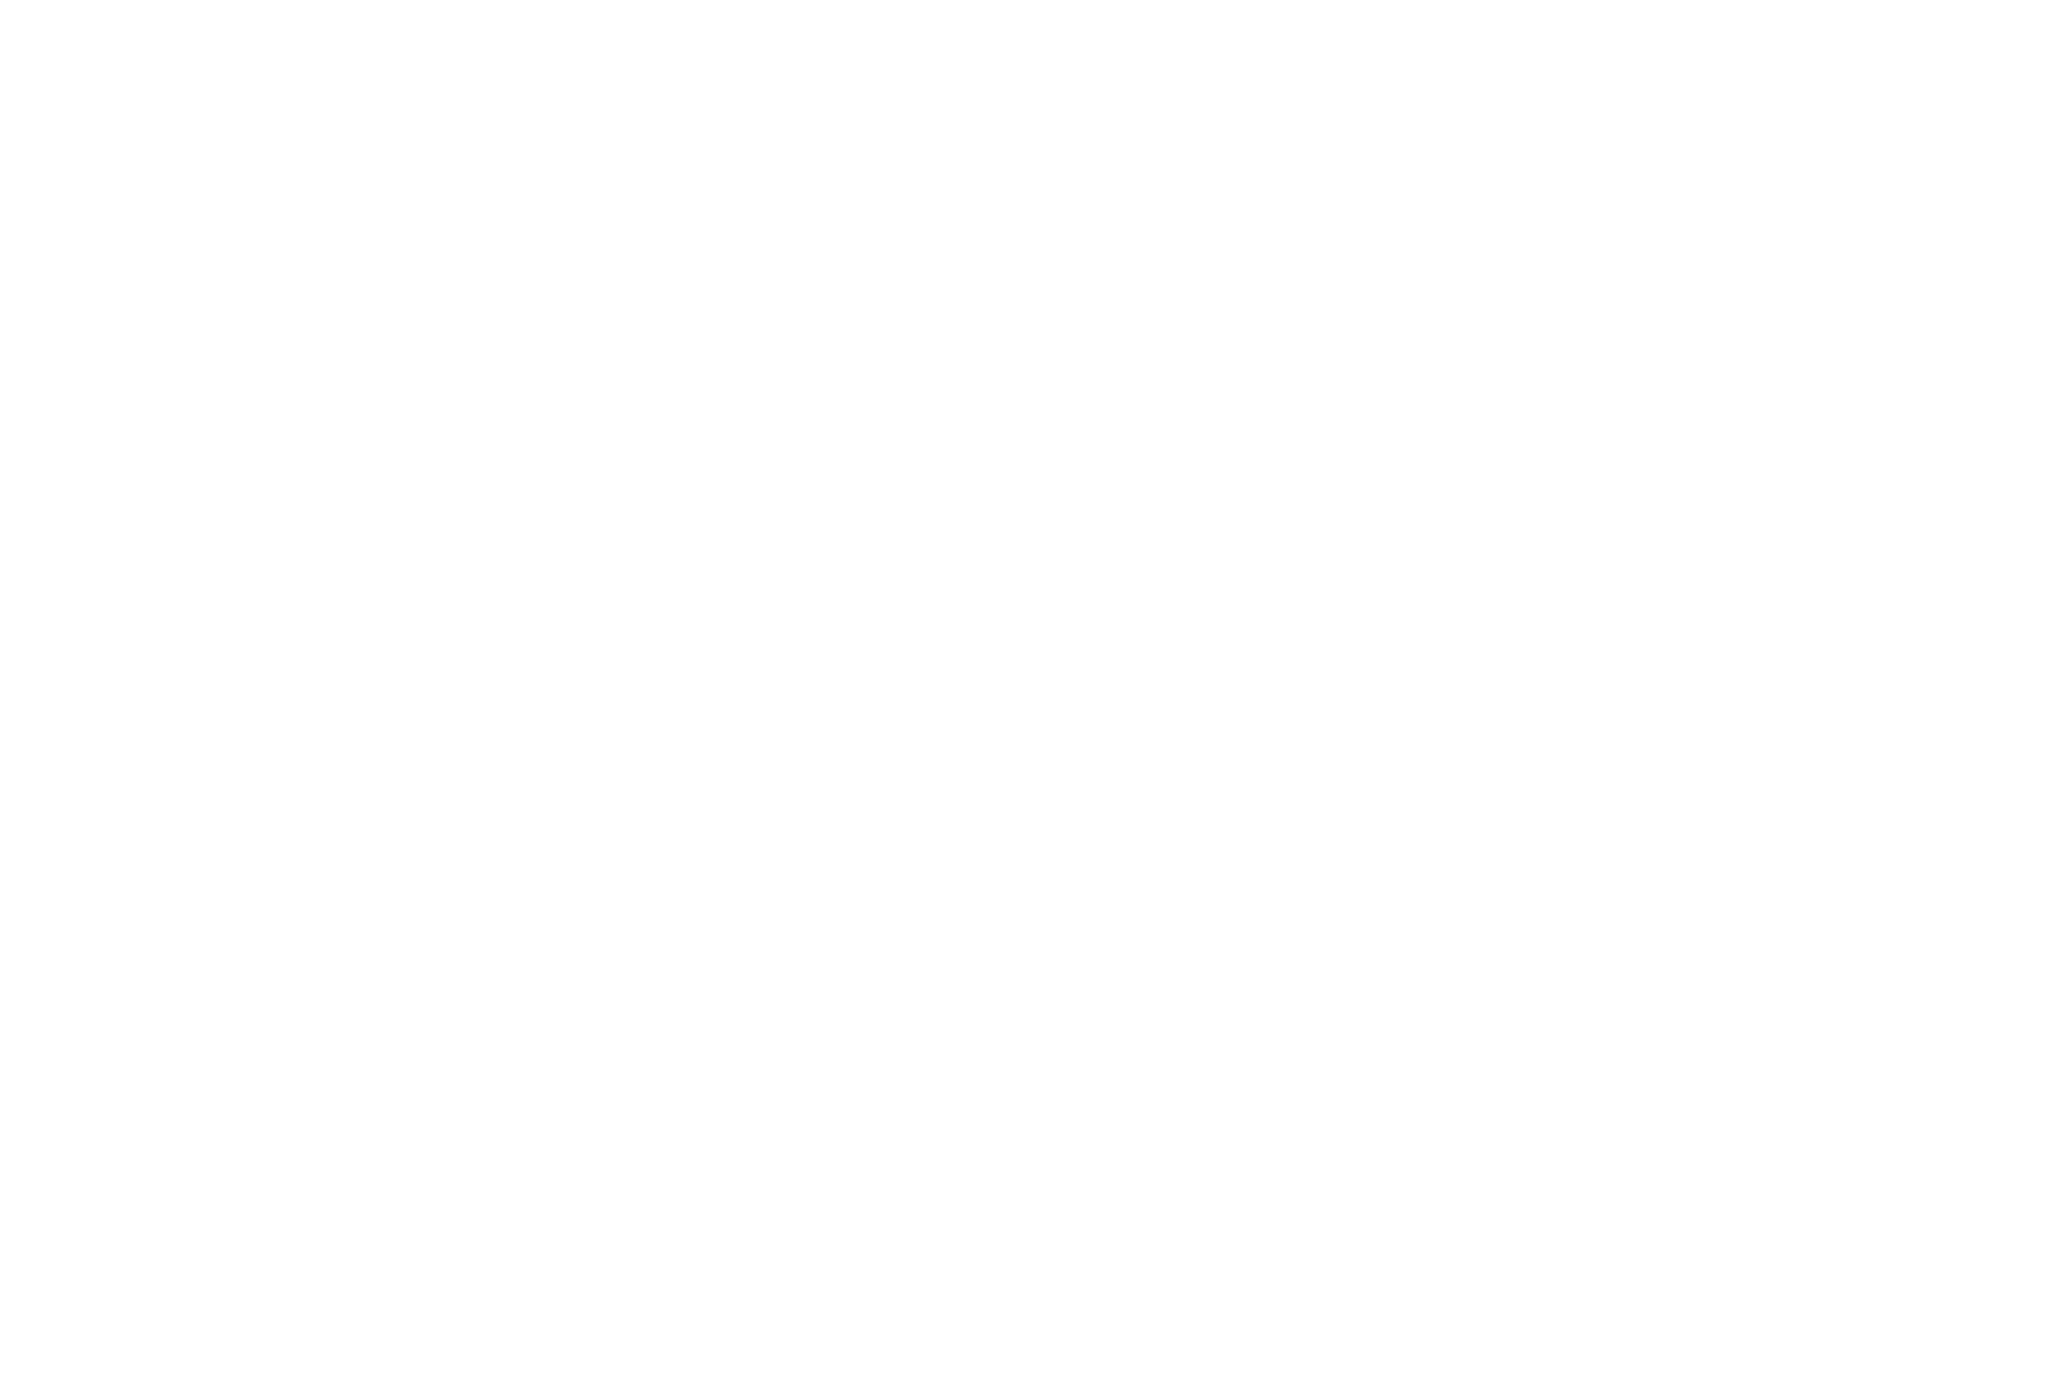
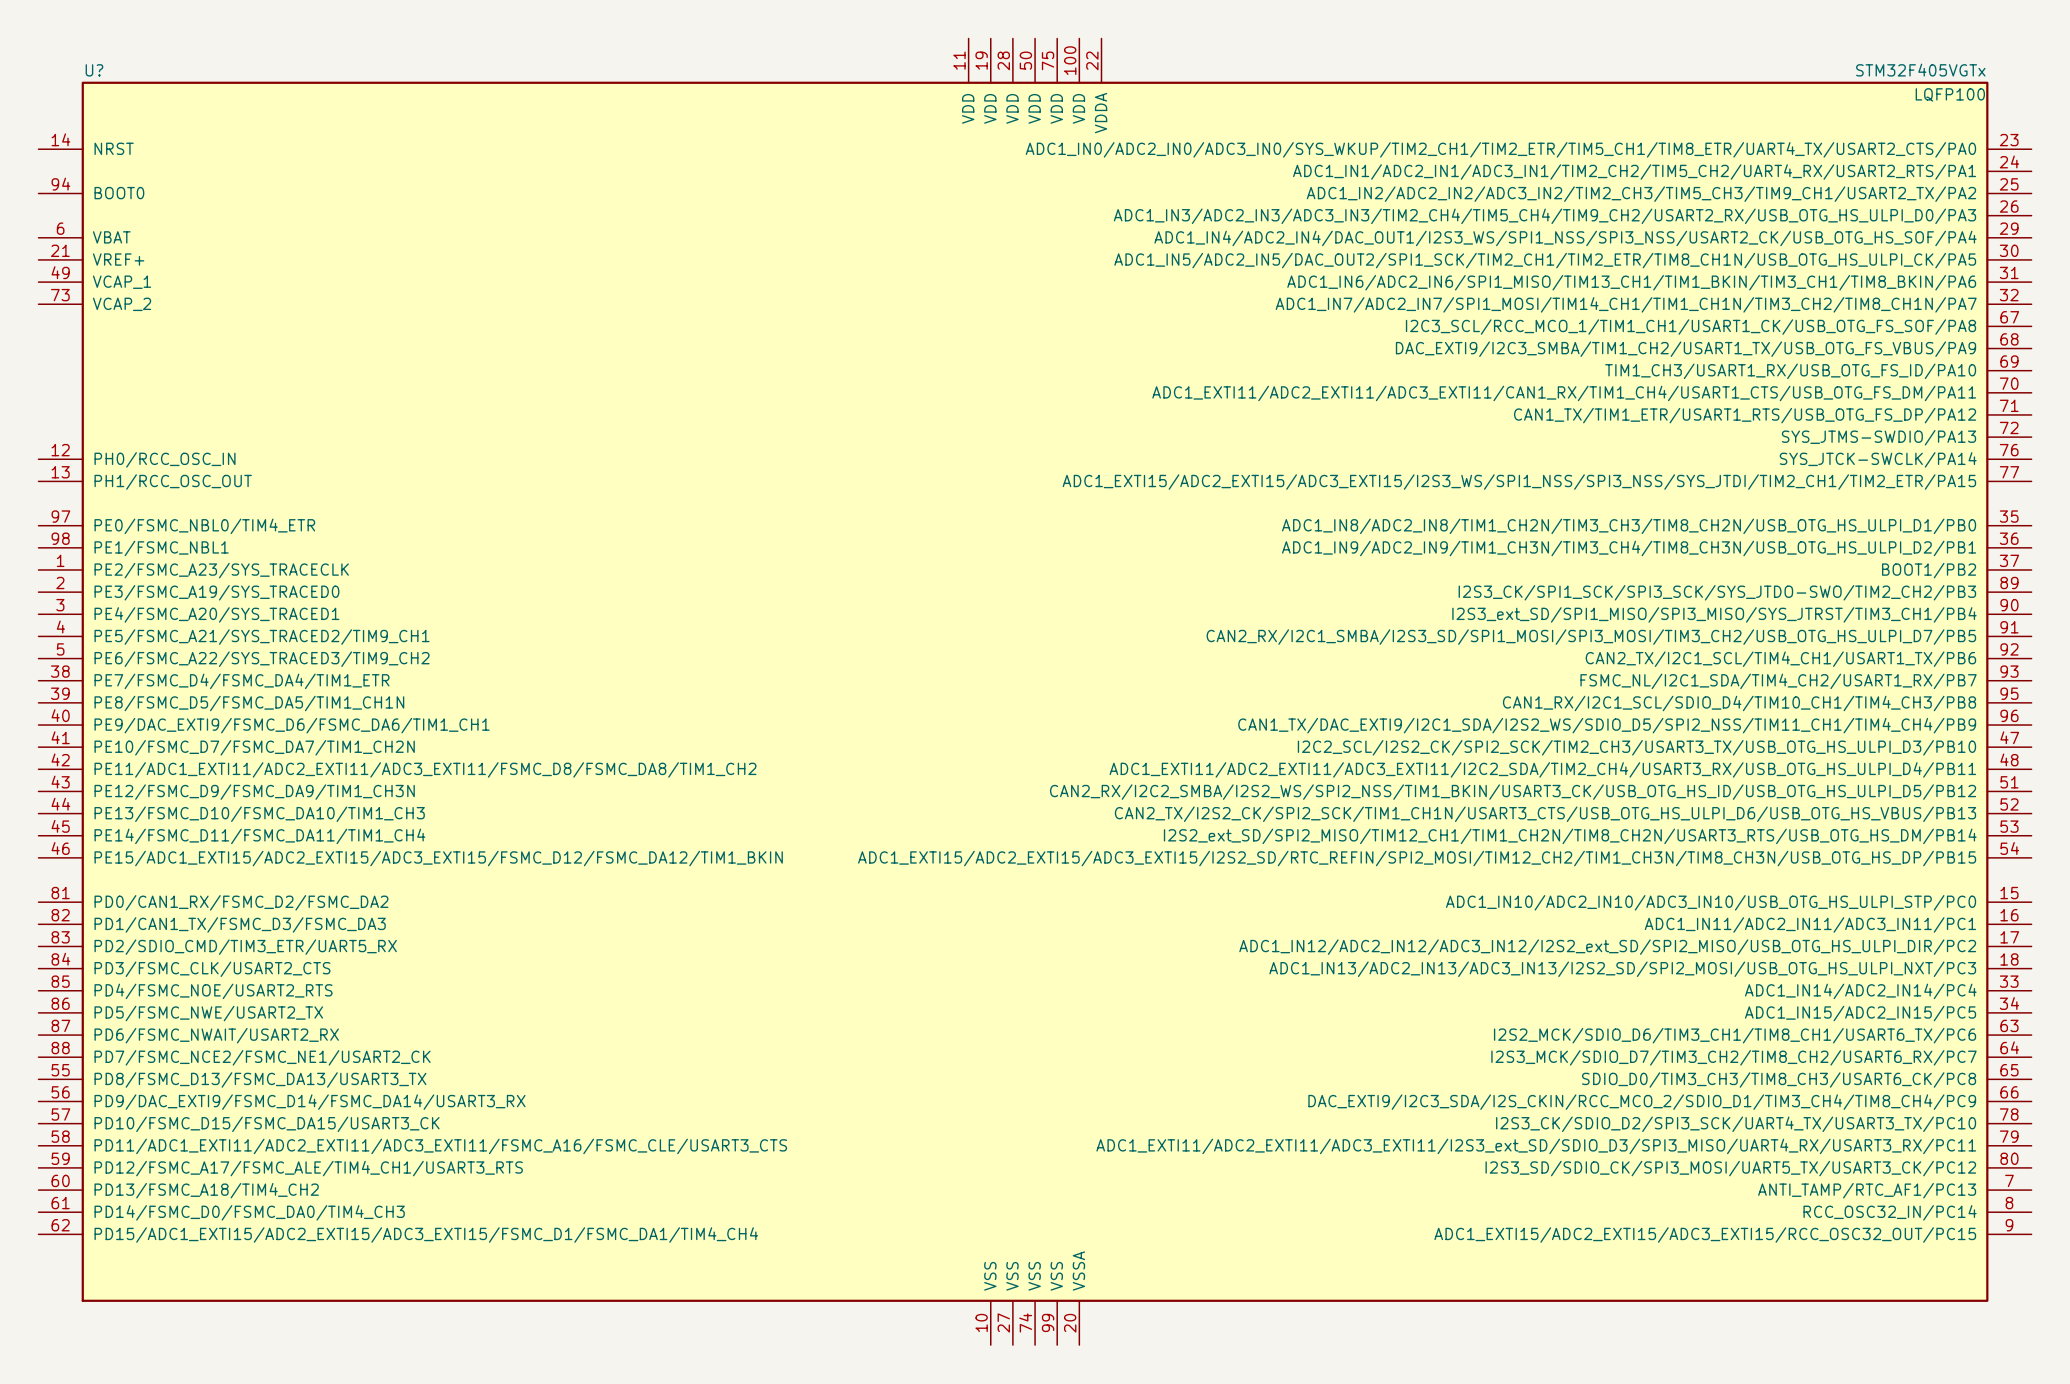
U?: none -> STM32F405VGTx (1035, 691)

